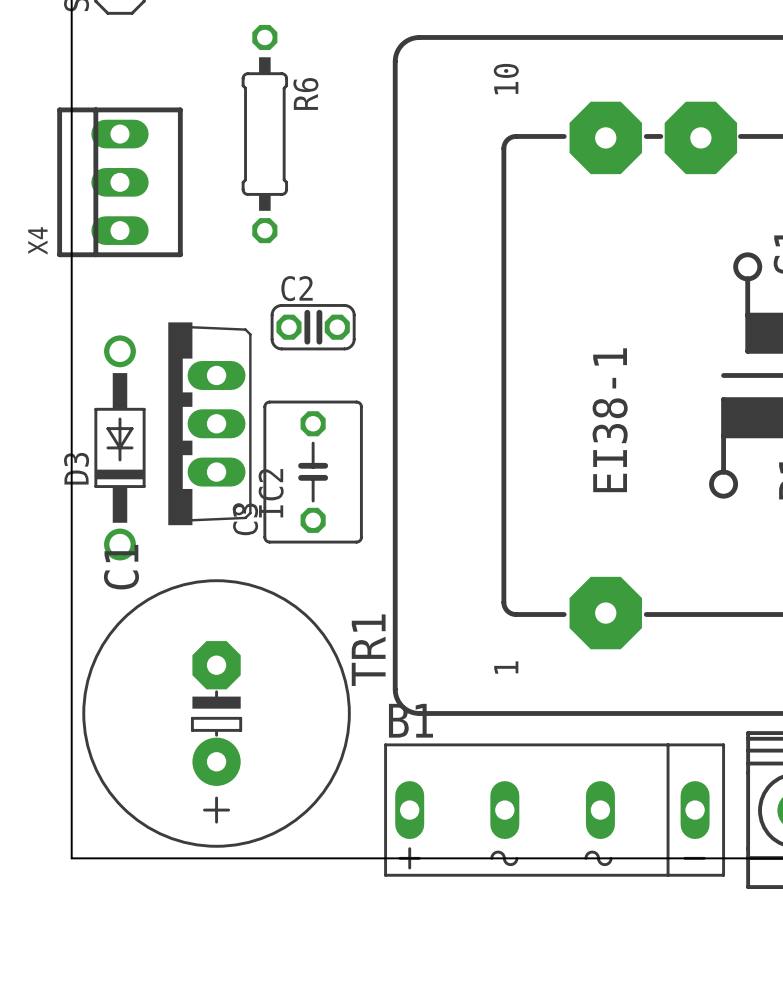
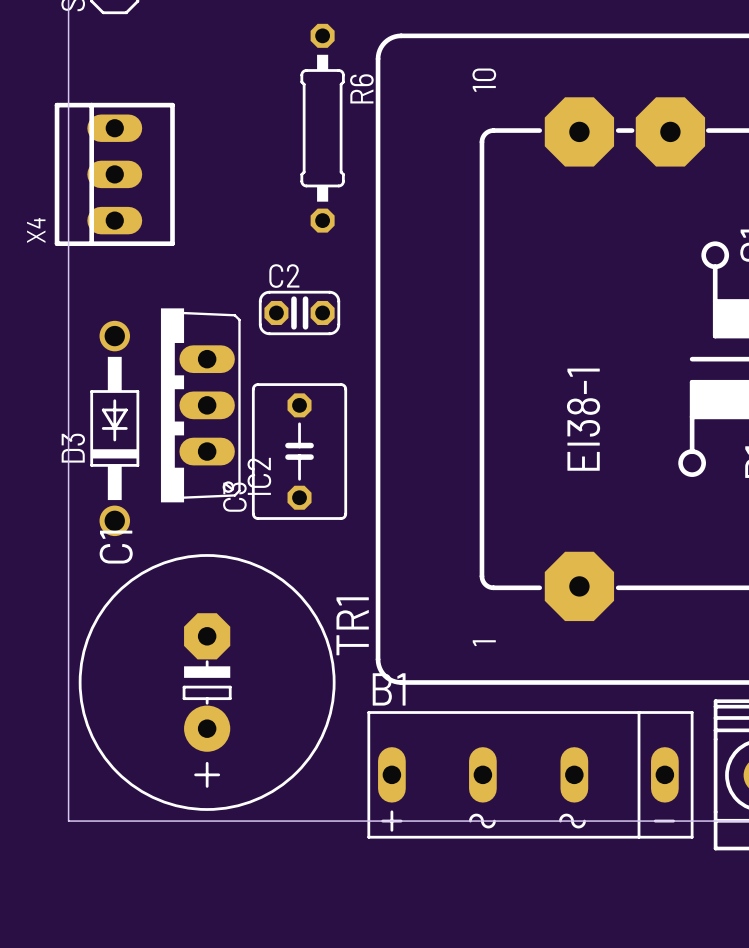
R6 position: (264, 134) -> (322, 128)

